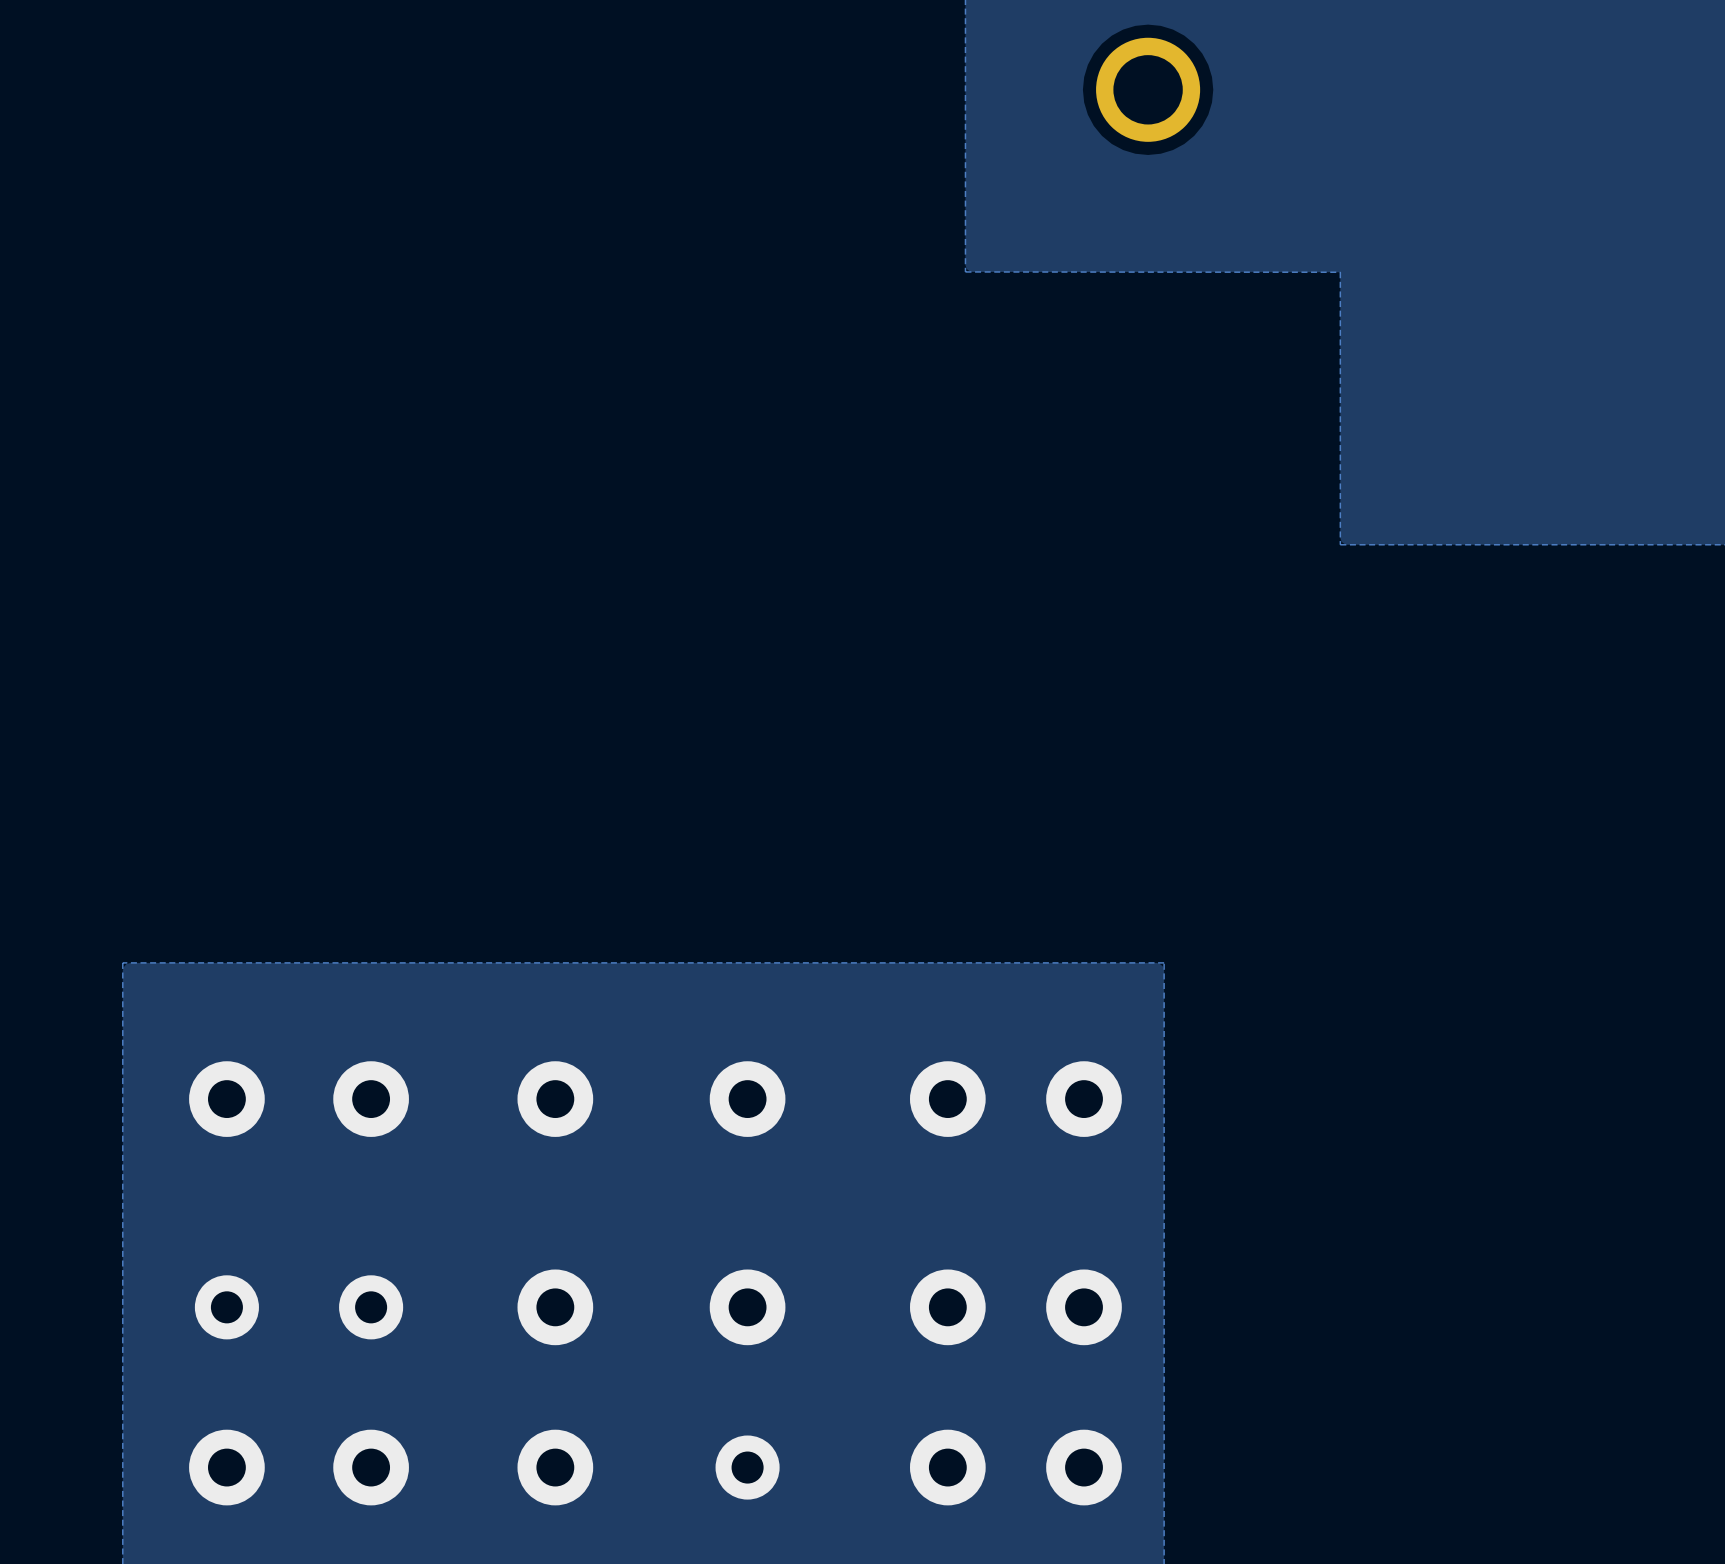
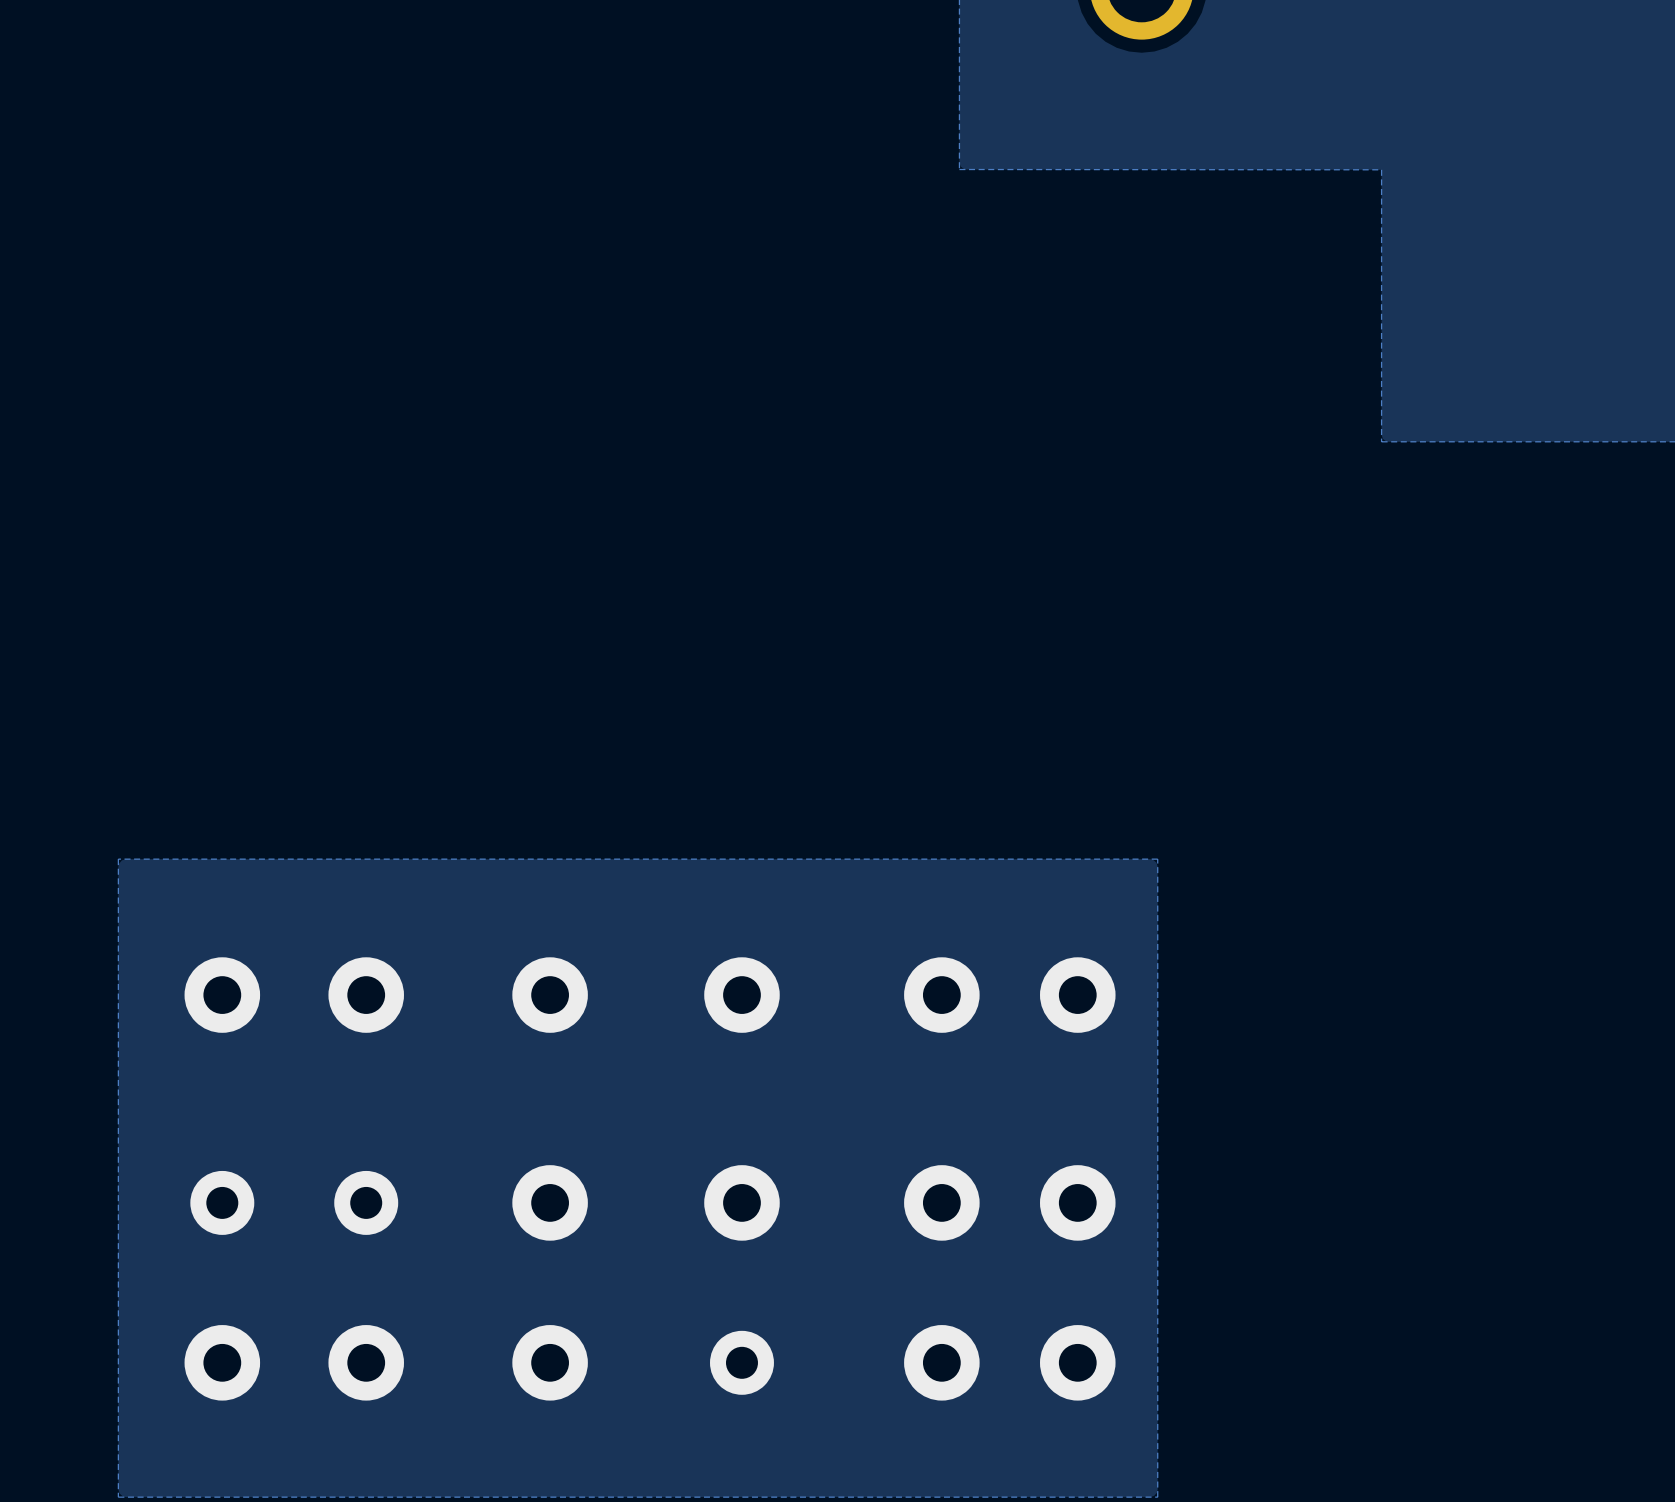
zone outline: (1340, 272) (1340, 544) (1388, 544) -> (1333, 169) (1381, 169) (1381, 441)

